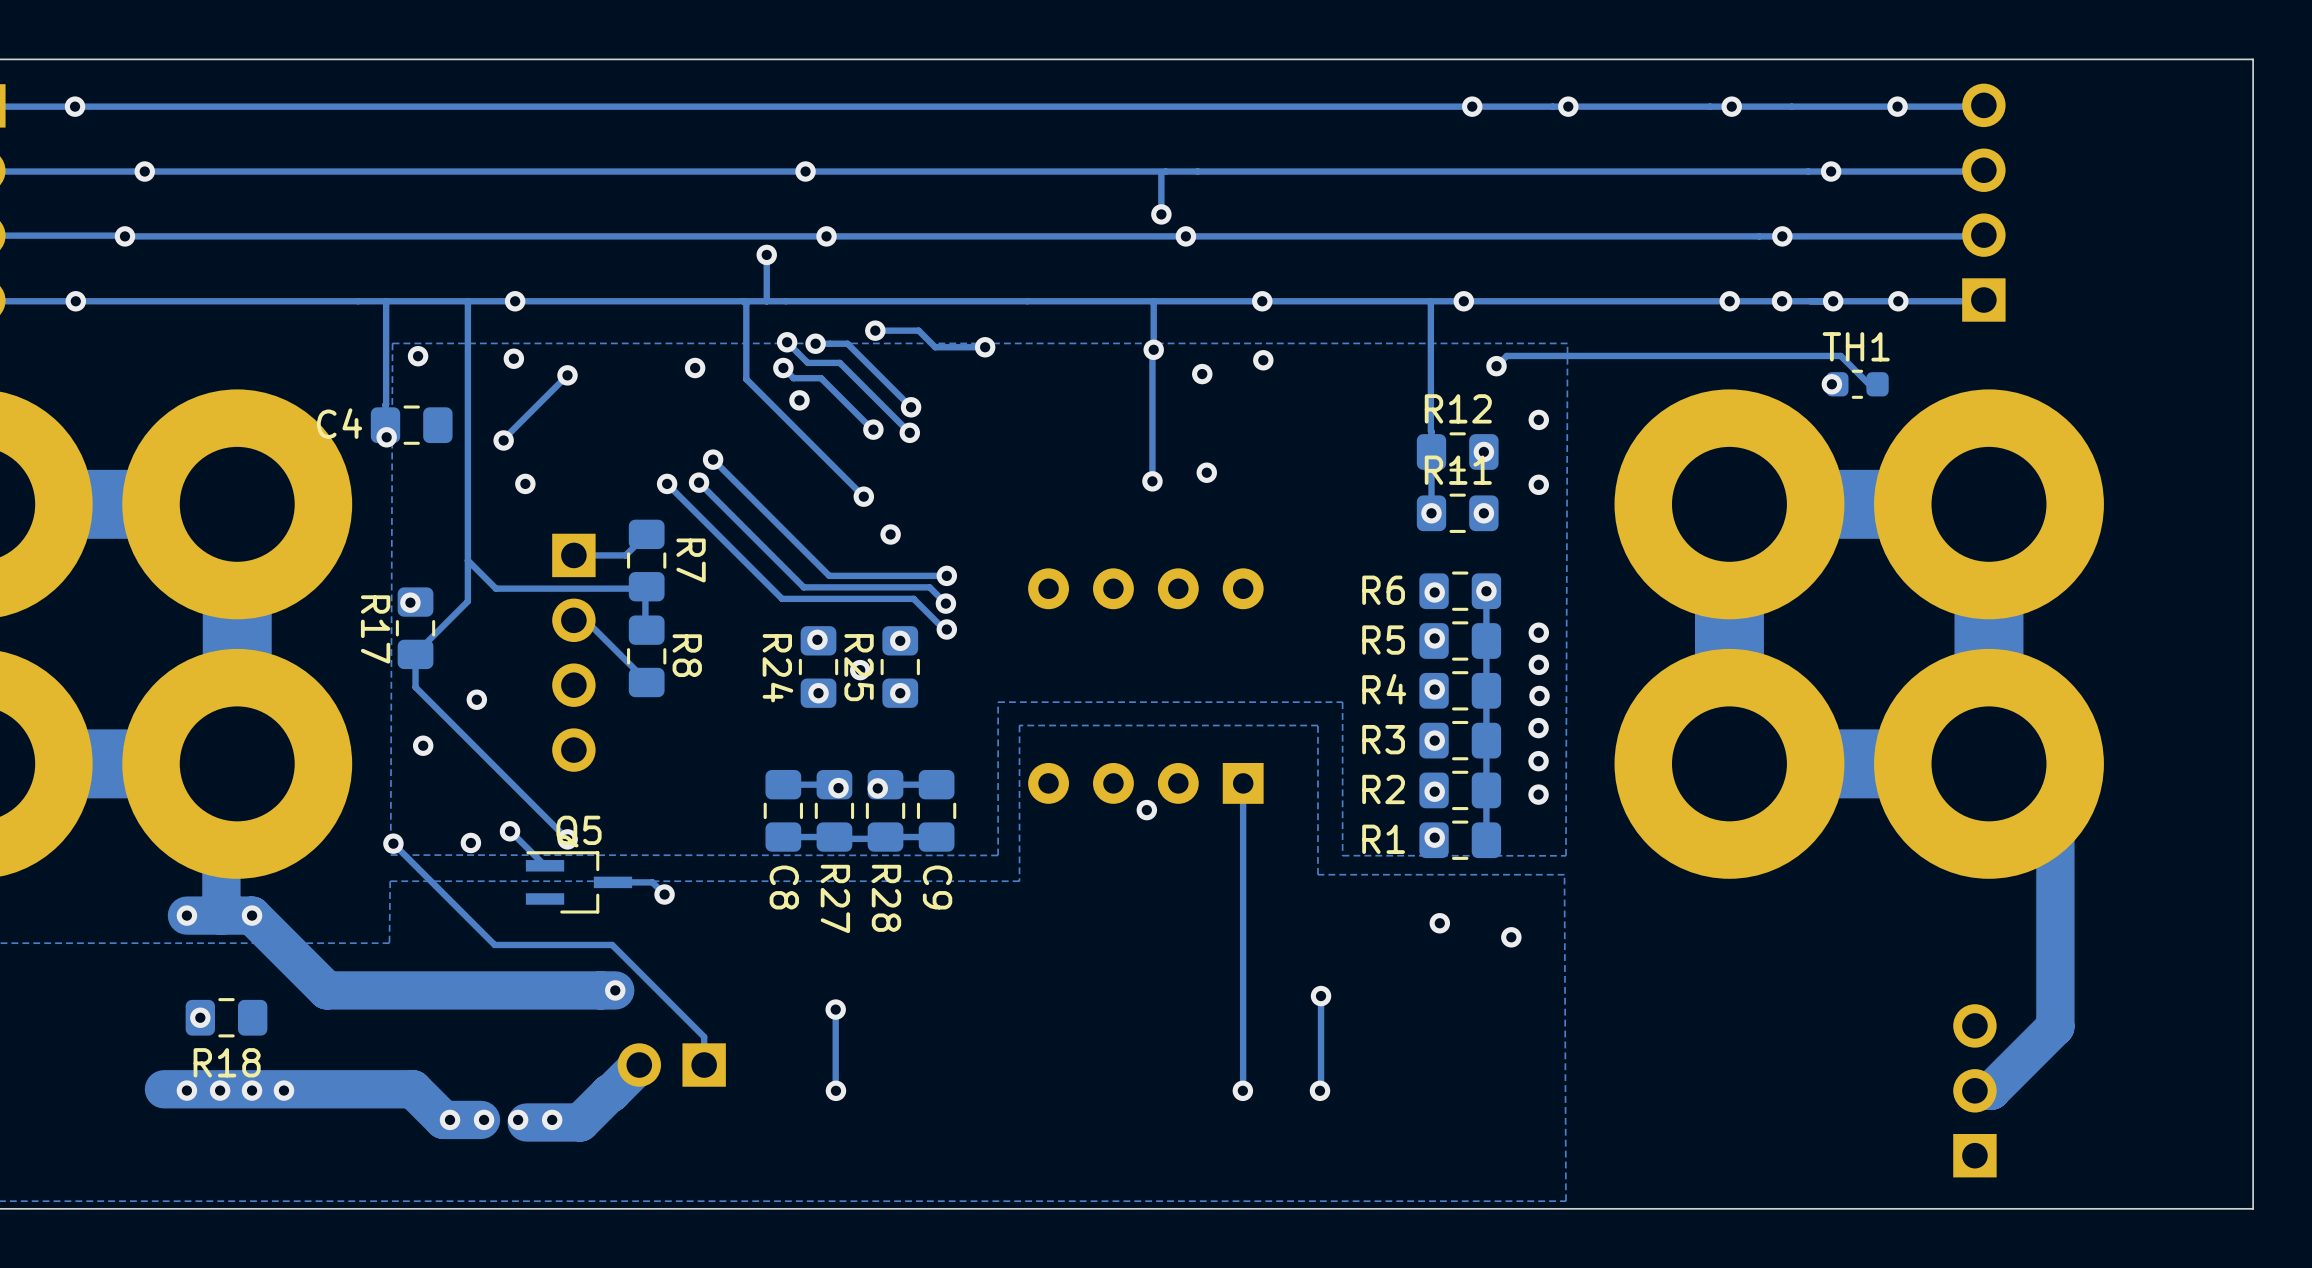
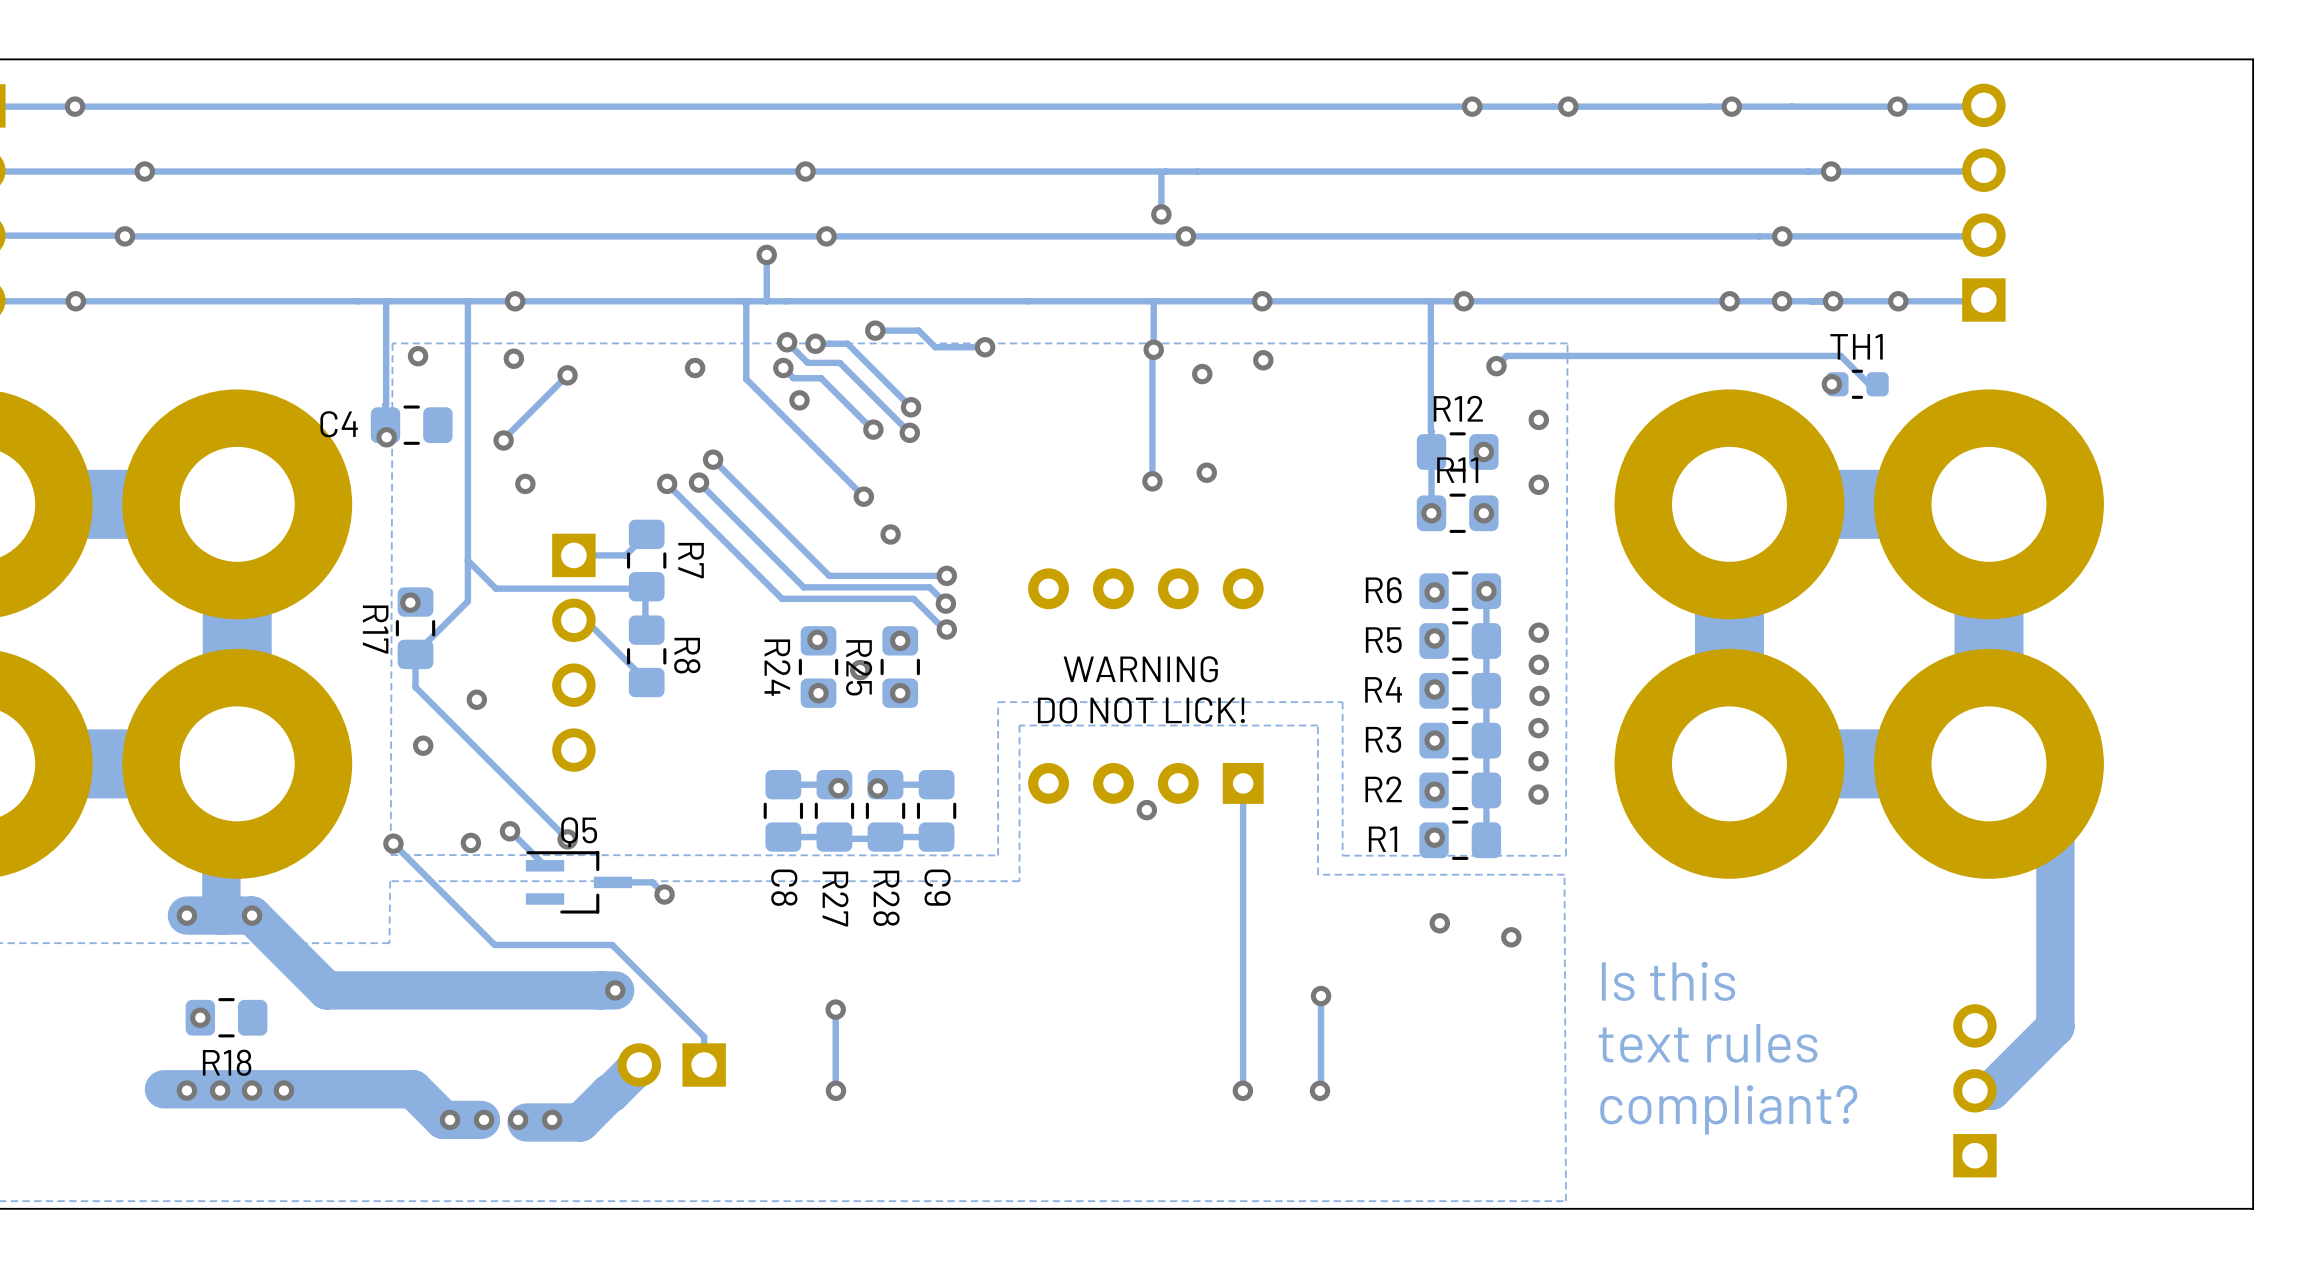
text: none -> WARNING (1140, 669)
text: none -> DO NOT LICK! (1141, 710)
text: none -> Is this (1668, 981)
text: none -> text rules (1708, 1043)
text: none -> compliant? (1728, 1109)

